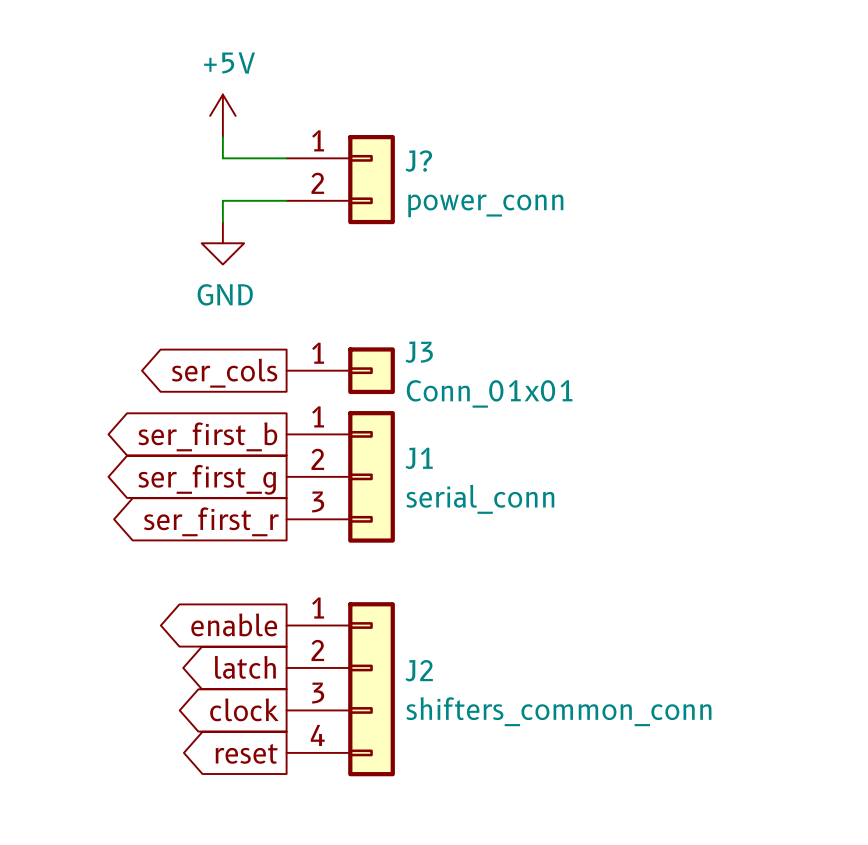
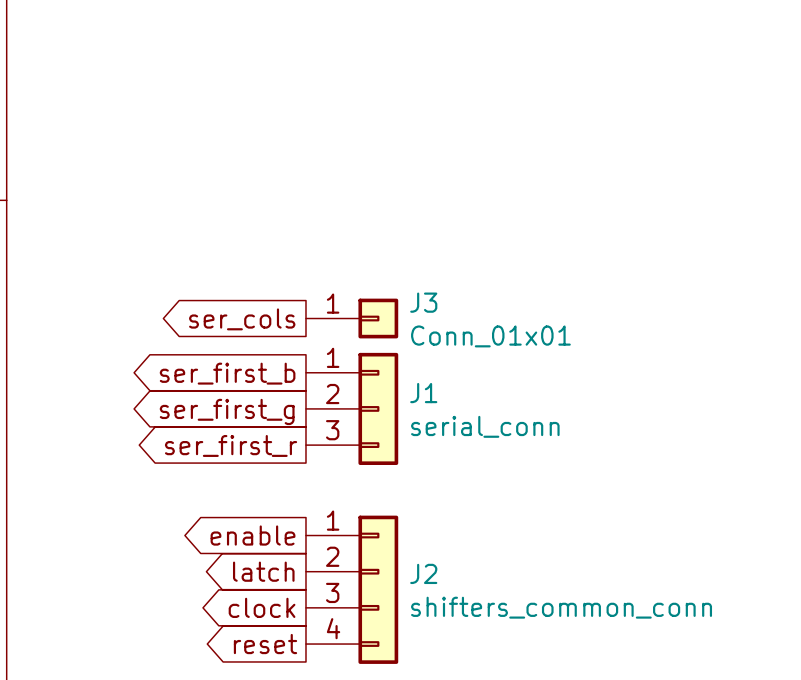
power symbol: +5V (222, 115) -> none
wire: (222, 137) (222, 158) (286, 158) -> none
J?: power_conn (340, 179) -> none
wire: (286, 200) (222, 200) (222, 222) -> none
power symbol: GND (222, 243) -> none

